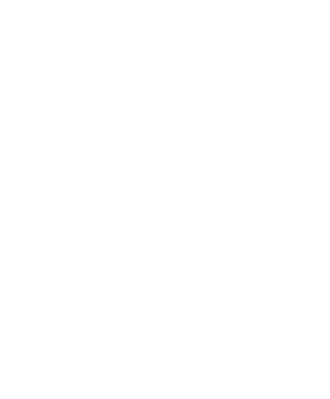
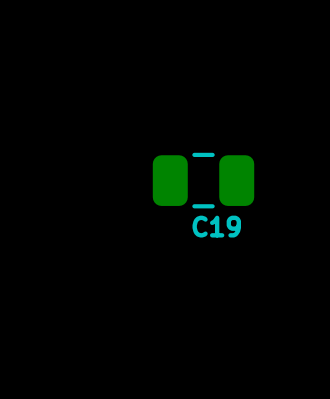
C19: none -> (203, 180)

